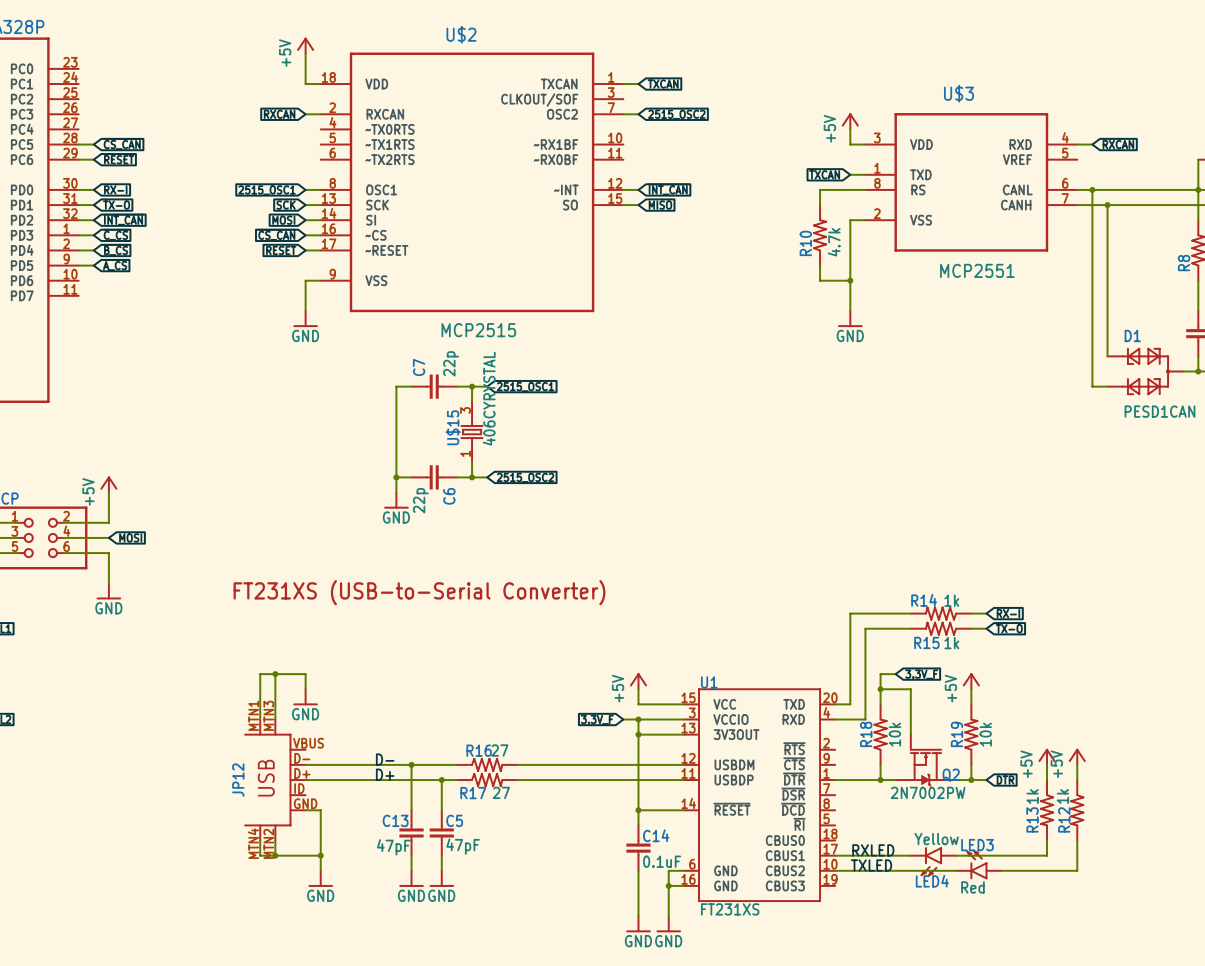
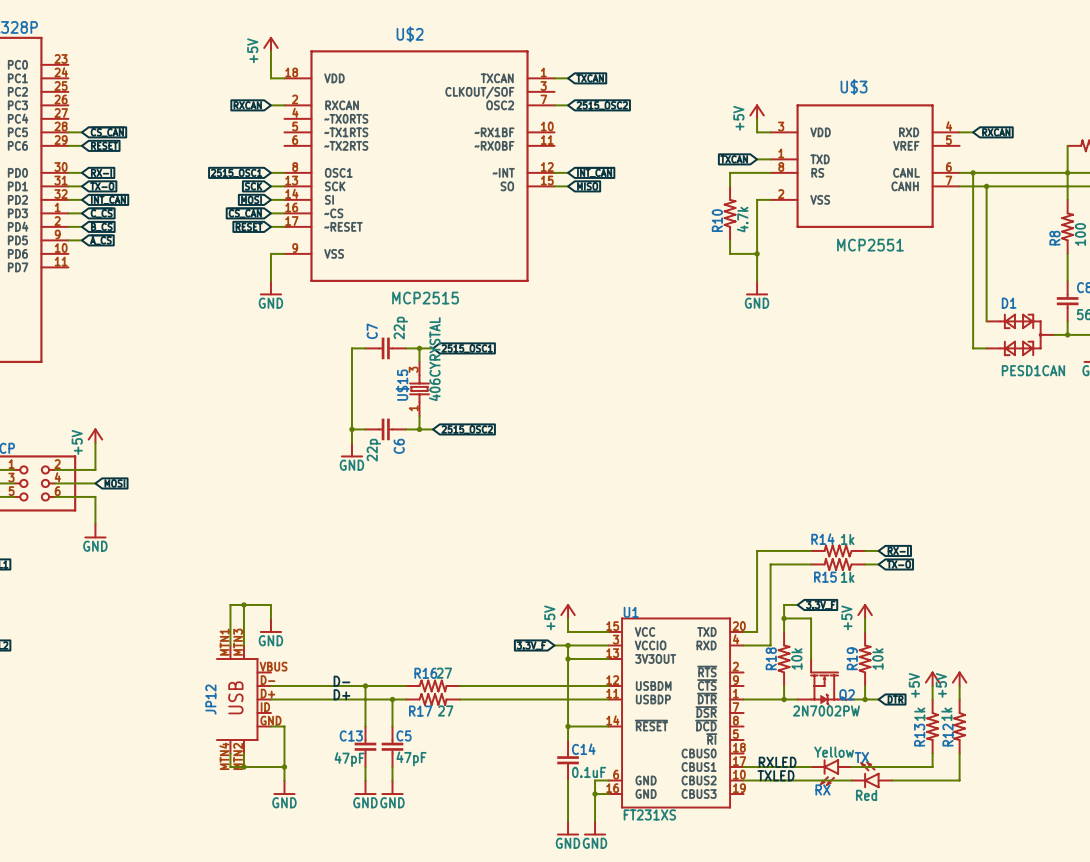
text: FT231XS (USB-to-Serial Converter) (419, 592) -> none
LED3 name: LED3 (977, 845) -> TX (861, 757)
LED4 name: LED4 (932, 881) -> RX (822, 789)

